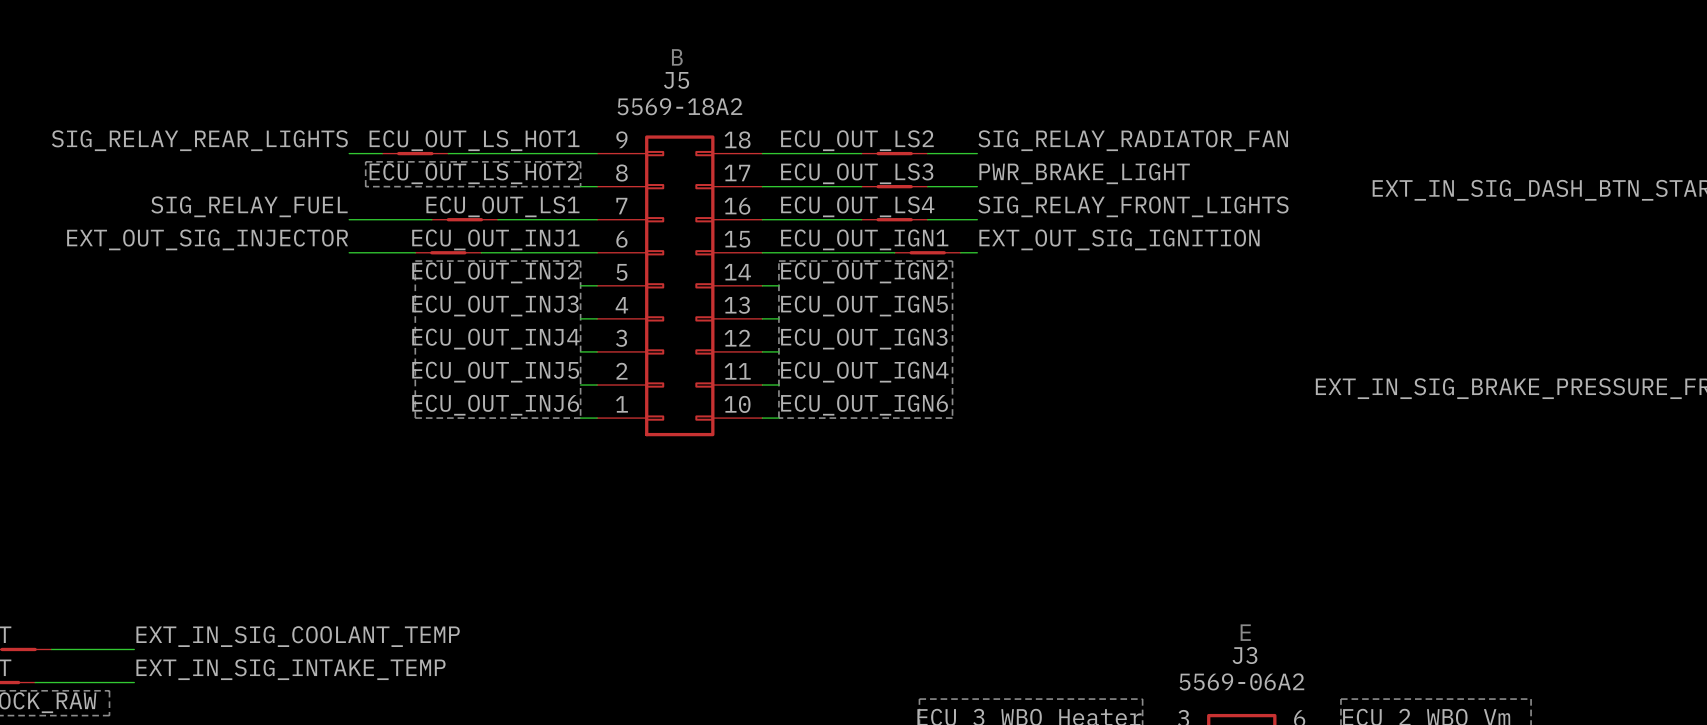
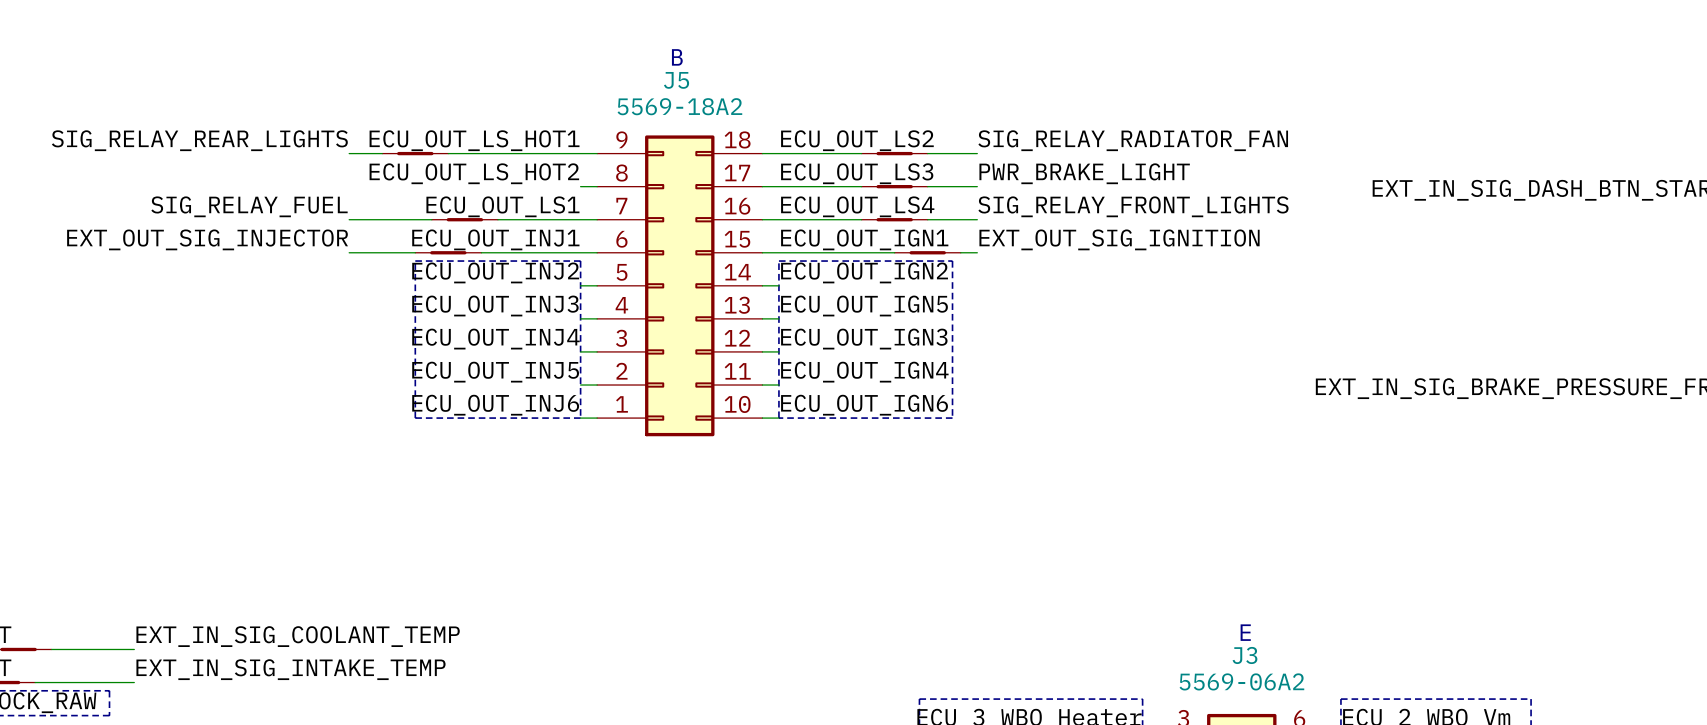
line: (365, 161) (580, 161) (580, 186) (365, 186) (365, 161) -> none

